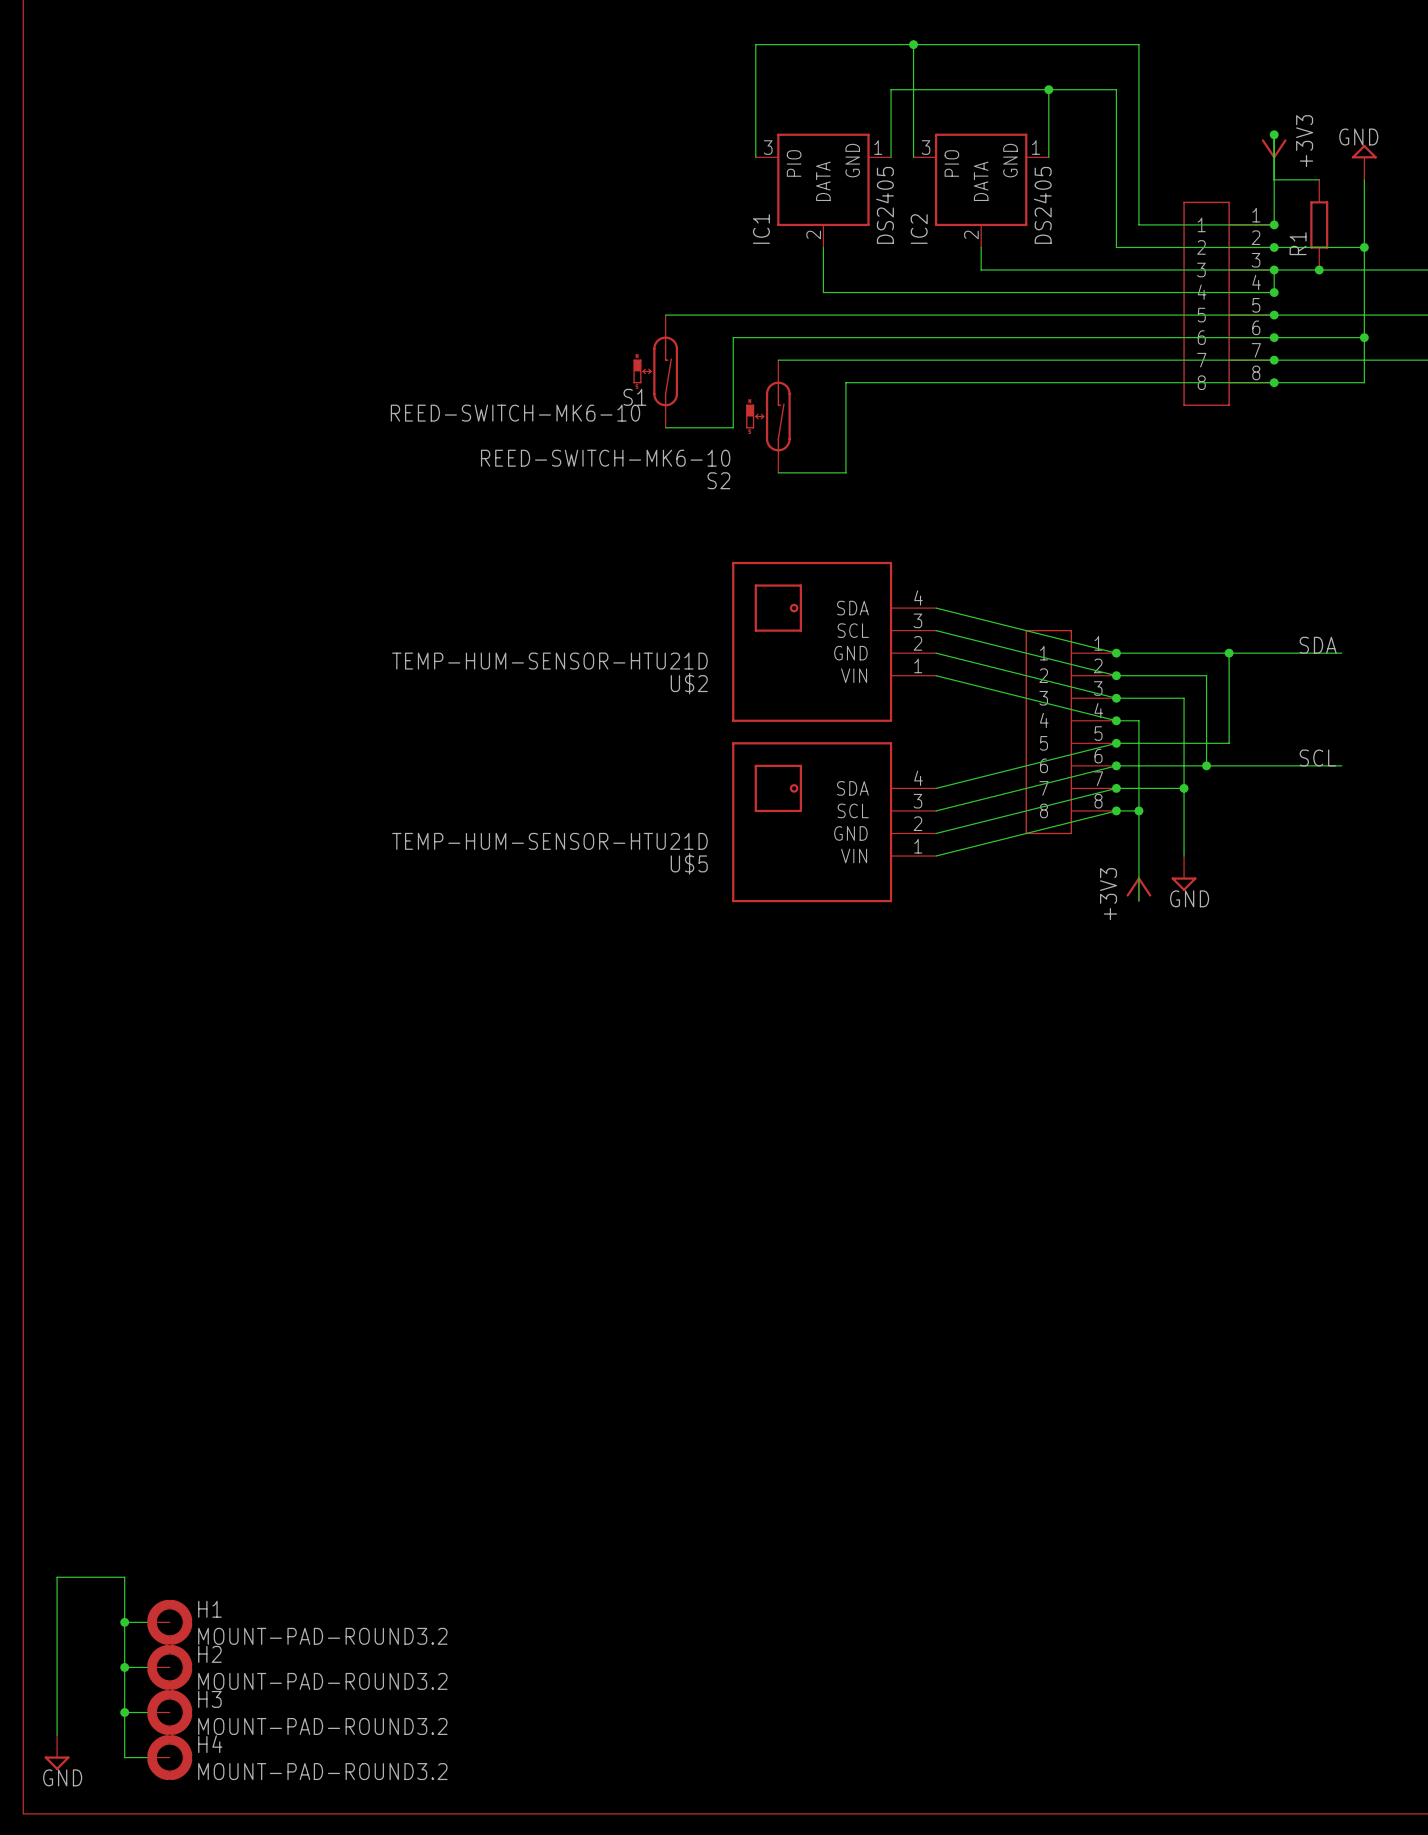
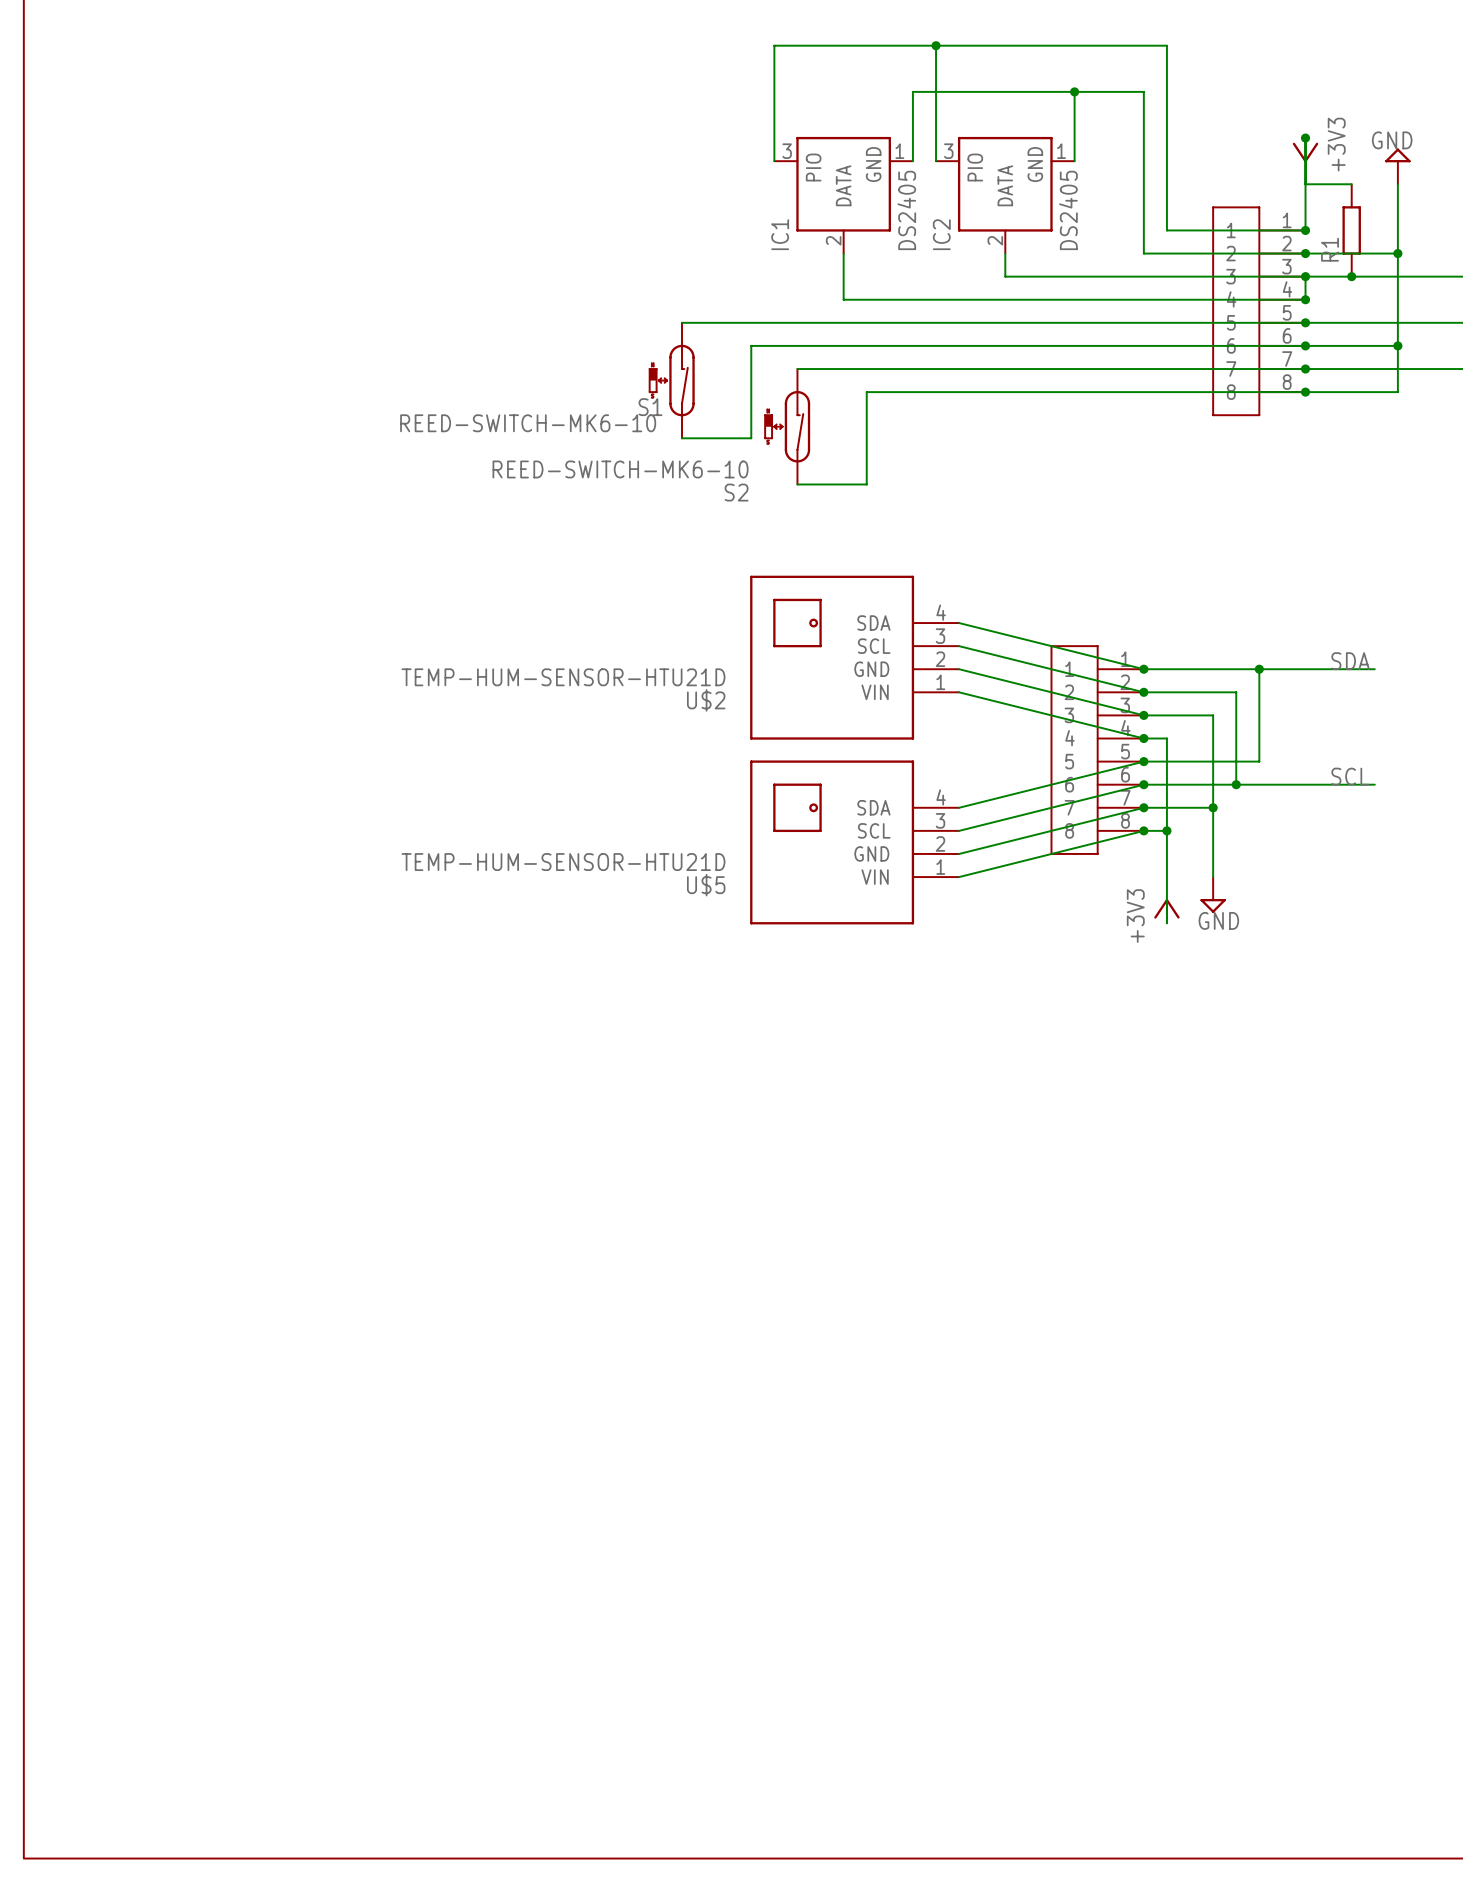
wire: (124, 1622) (147, 1622) -> none
junction: (124, 1622) -> none
H1: MOUNT-PAD-ROUND3.2 (169, 1622) -> none
wire: (124, 1667) (147, 1667) -> none
junction: (124, 1667) -> none
H2: MOUNT-PAD-ROUND3.2 (169, 1667) -> none
wire: (124, 1712) (147, 1712) -> none
junction: (124, 1712) -> none
H3: MOUNT-PAD-ROUND3.2 (169, 1712) -> none
wire: (57, 1735) (57, 1577) (124, 1577) (124, 1757) (147, 1757) -> none
power symbol: GND (57, 1752) -> none
H4: MOUNT-PAD-ROUND3.2 (169, 1757) -> none

